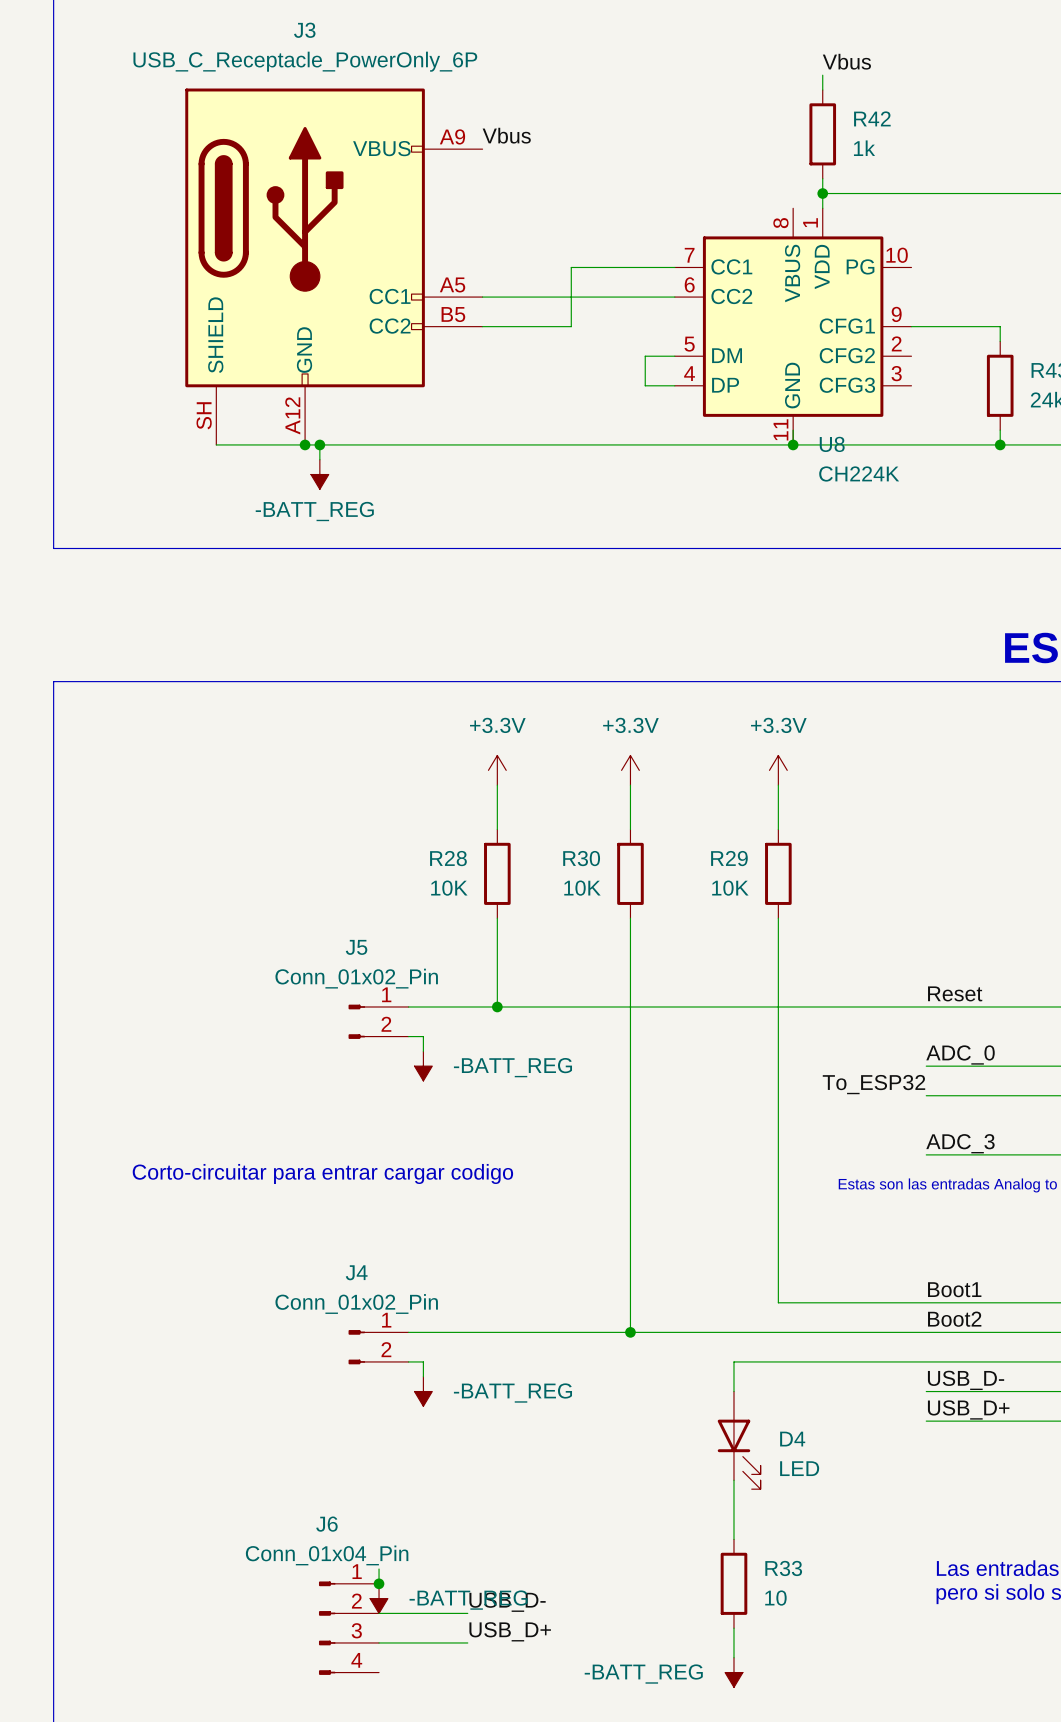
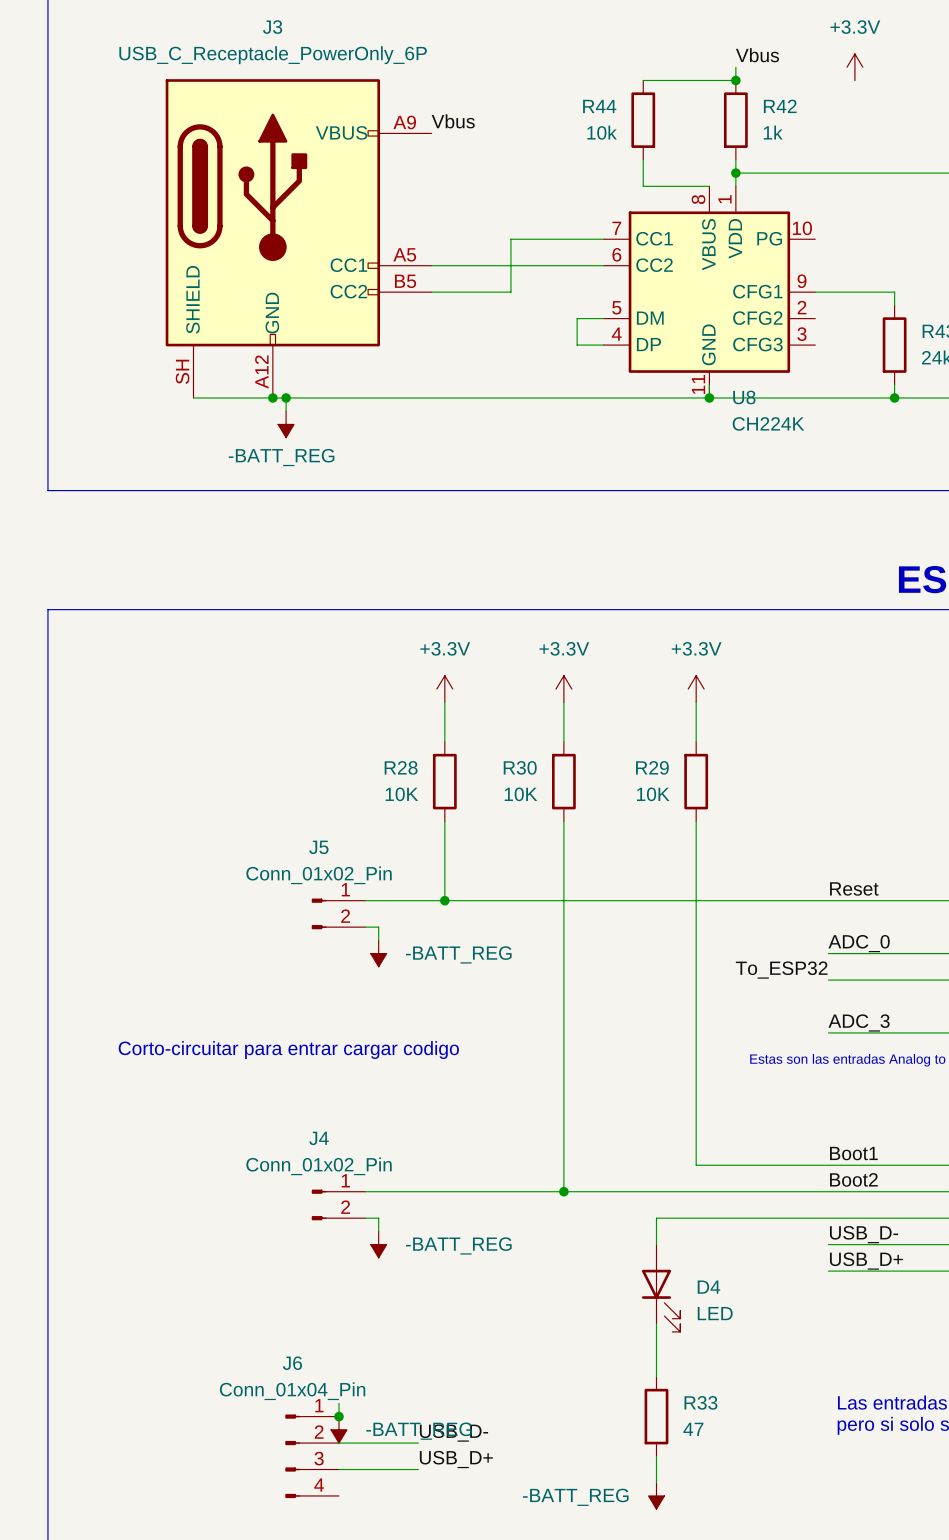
power symbol: none -> +3.3V (854, 67)
wire: none -> (643, 80) (735, 80)
junction: none -> (735, 80)
R44: none -> 10k (643, 120)
wire: none -> (643, 159) (643, 186) (709, 186)
R33 value: 10 (775, 1598) -> 47 (693, 1429)

